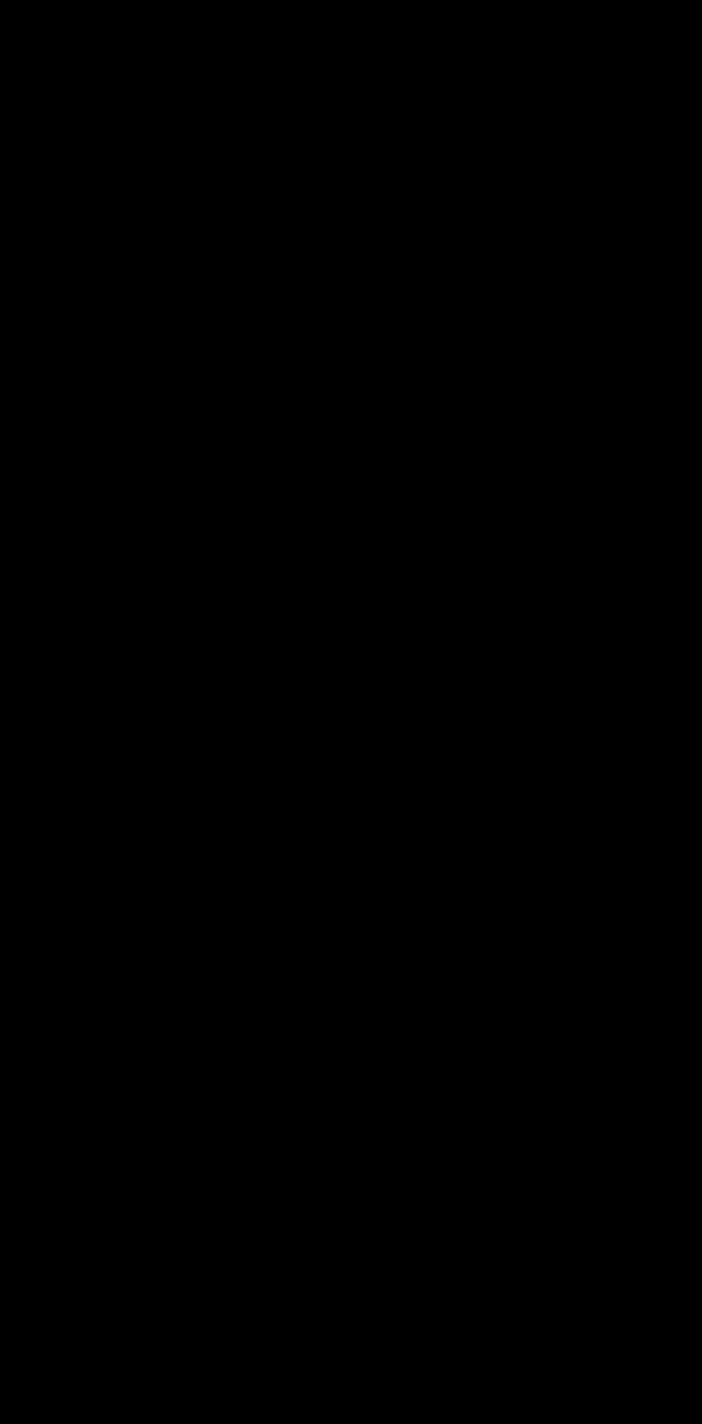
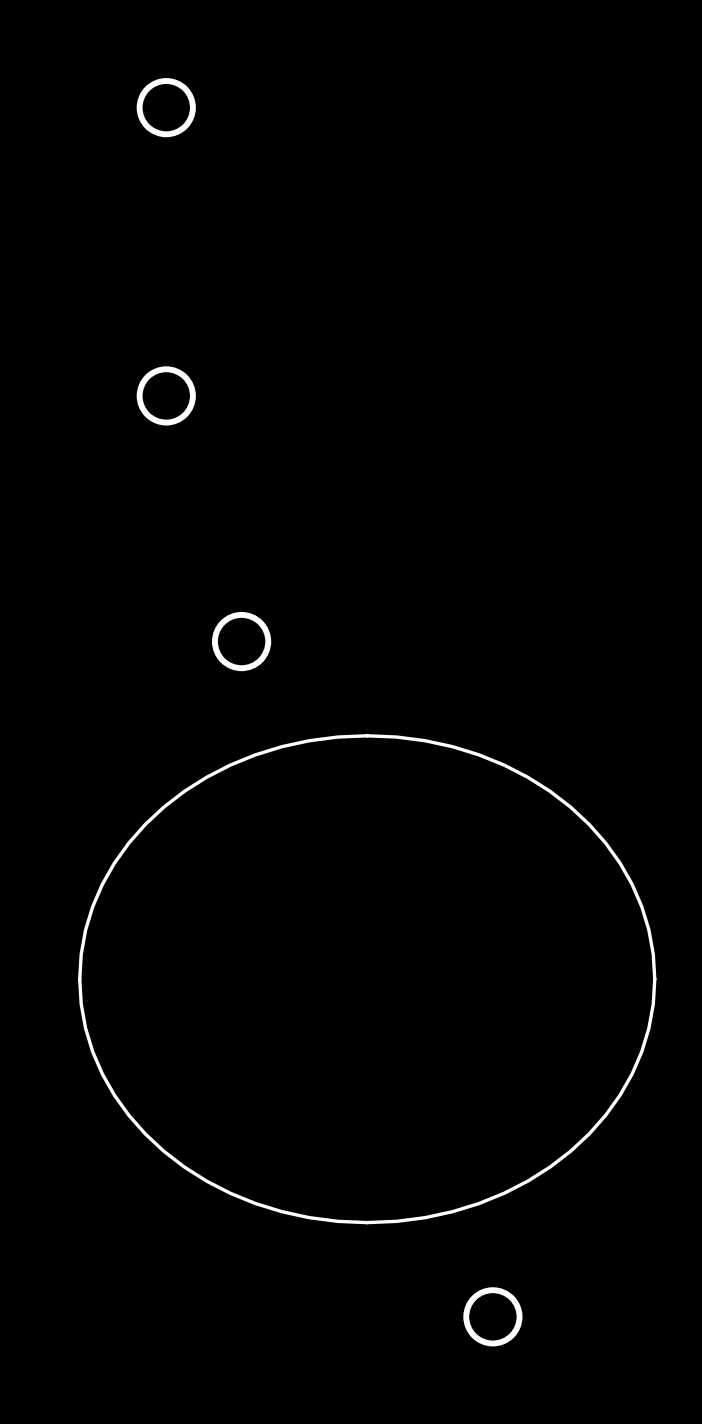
round board edge: none -> [136, 78, 196, 138]
round board edge: none -> [136, 366, 196, 426]
round board edge: none -> [212, 611, 272, 672]
board edge: none -> (367, 735) (425, 740) (479, 754) (528, 777) (570, 807) (605, 843) (632, 884) (648, 930) (654, 979) (648, 1028) (632, 1073) (605, 1115) (570, 1151) (528, 1181) (479, 1203) (425, 1217) (367, 1222) (309, 1217) (255, 1203) (206, 1181) (163, 1151) (128, 1115) (102, 1073) (85, 1028) (79, 979) (85, 930) (102, 884) (128, 843) (163, 807) (206, 777) (255, 754) (309, 740) (367, 735)
round board edge: none -> [463, 1287, 523, 1347]

